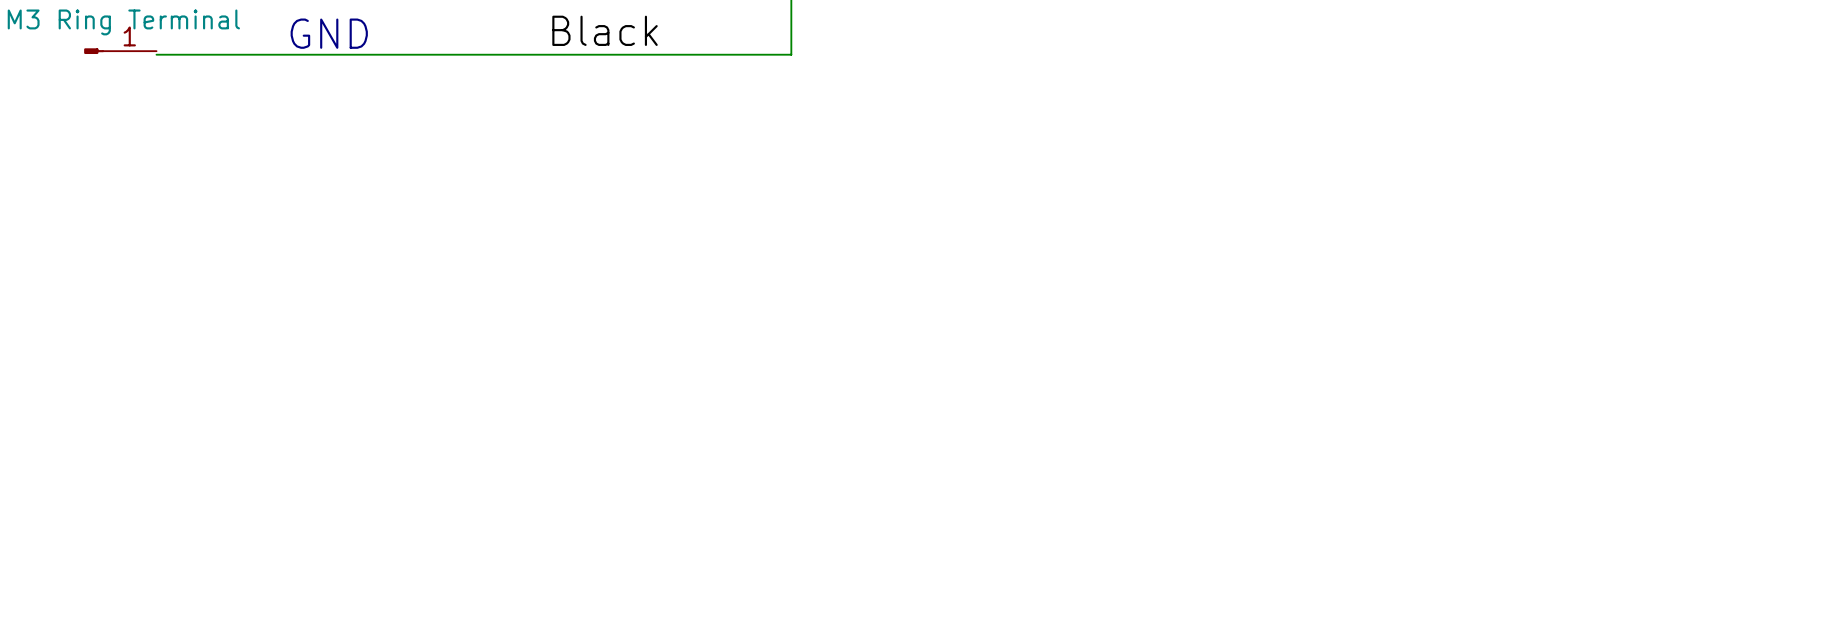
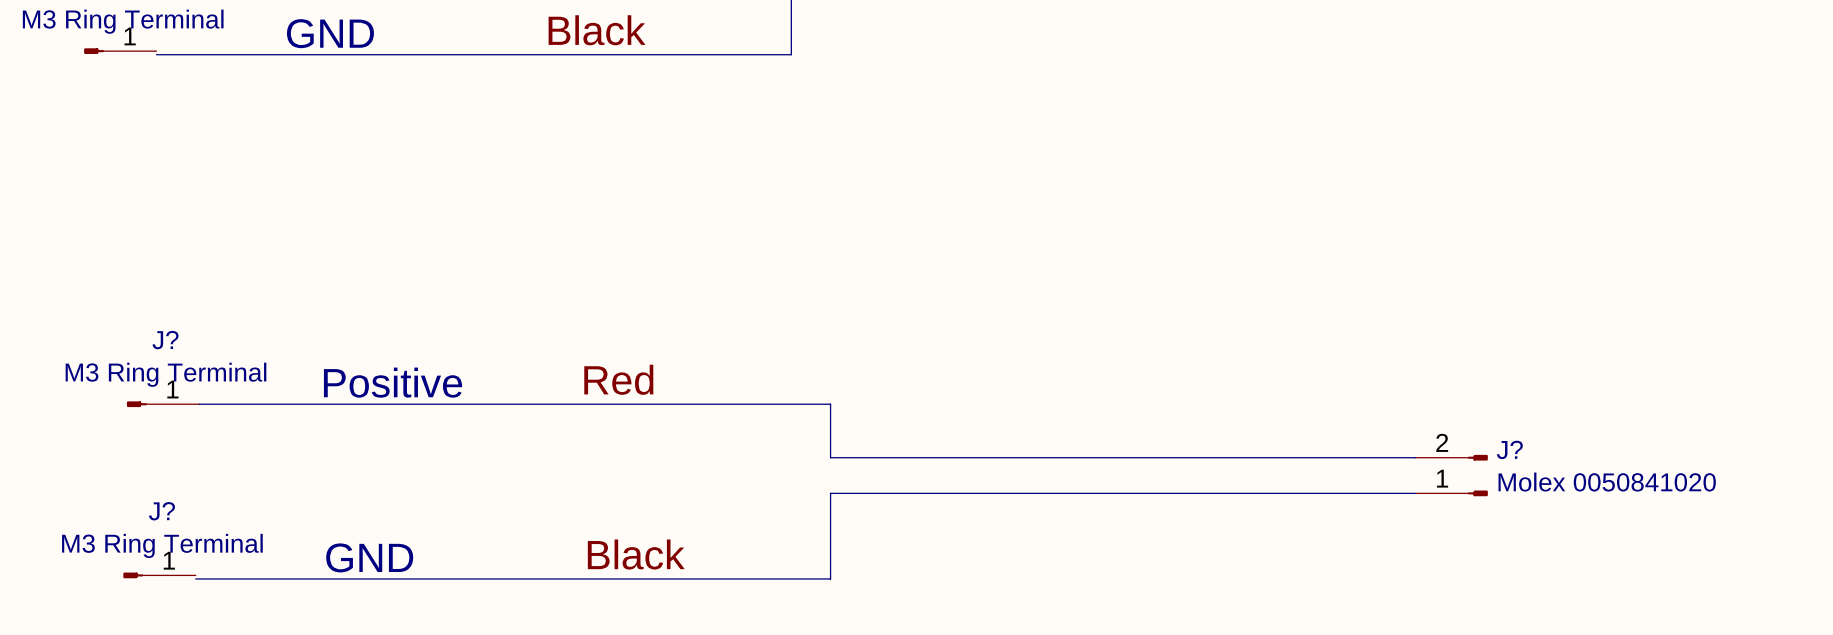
label: none -> Red (618, 379)
text: none -> Positive (393, 382)
J?: none -> M3 Ring Terminal (163, 404)
wire: none -> (199, 404) (830, 404) (830, 457) (1415, 457)
J?: none -> Molex 0050841020 (1451, 475)
wire: none -> (1415, 493) (830, 493) (830, 578) (195, 578)
label: none -> Black (636, 554)
text: none -> GND (369, 557)
J?: none -> M3 Ring Terminal (159, 575)

